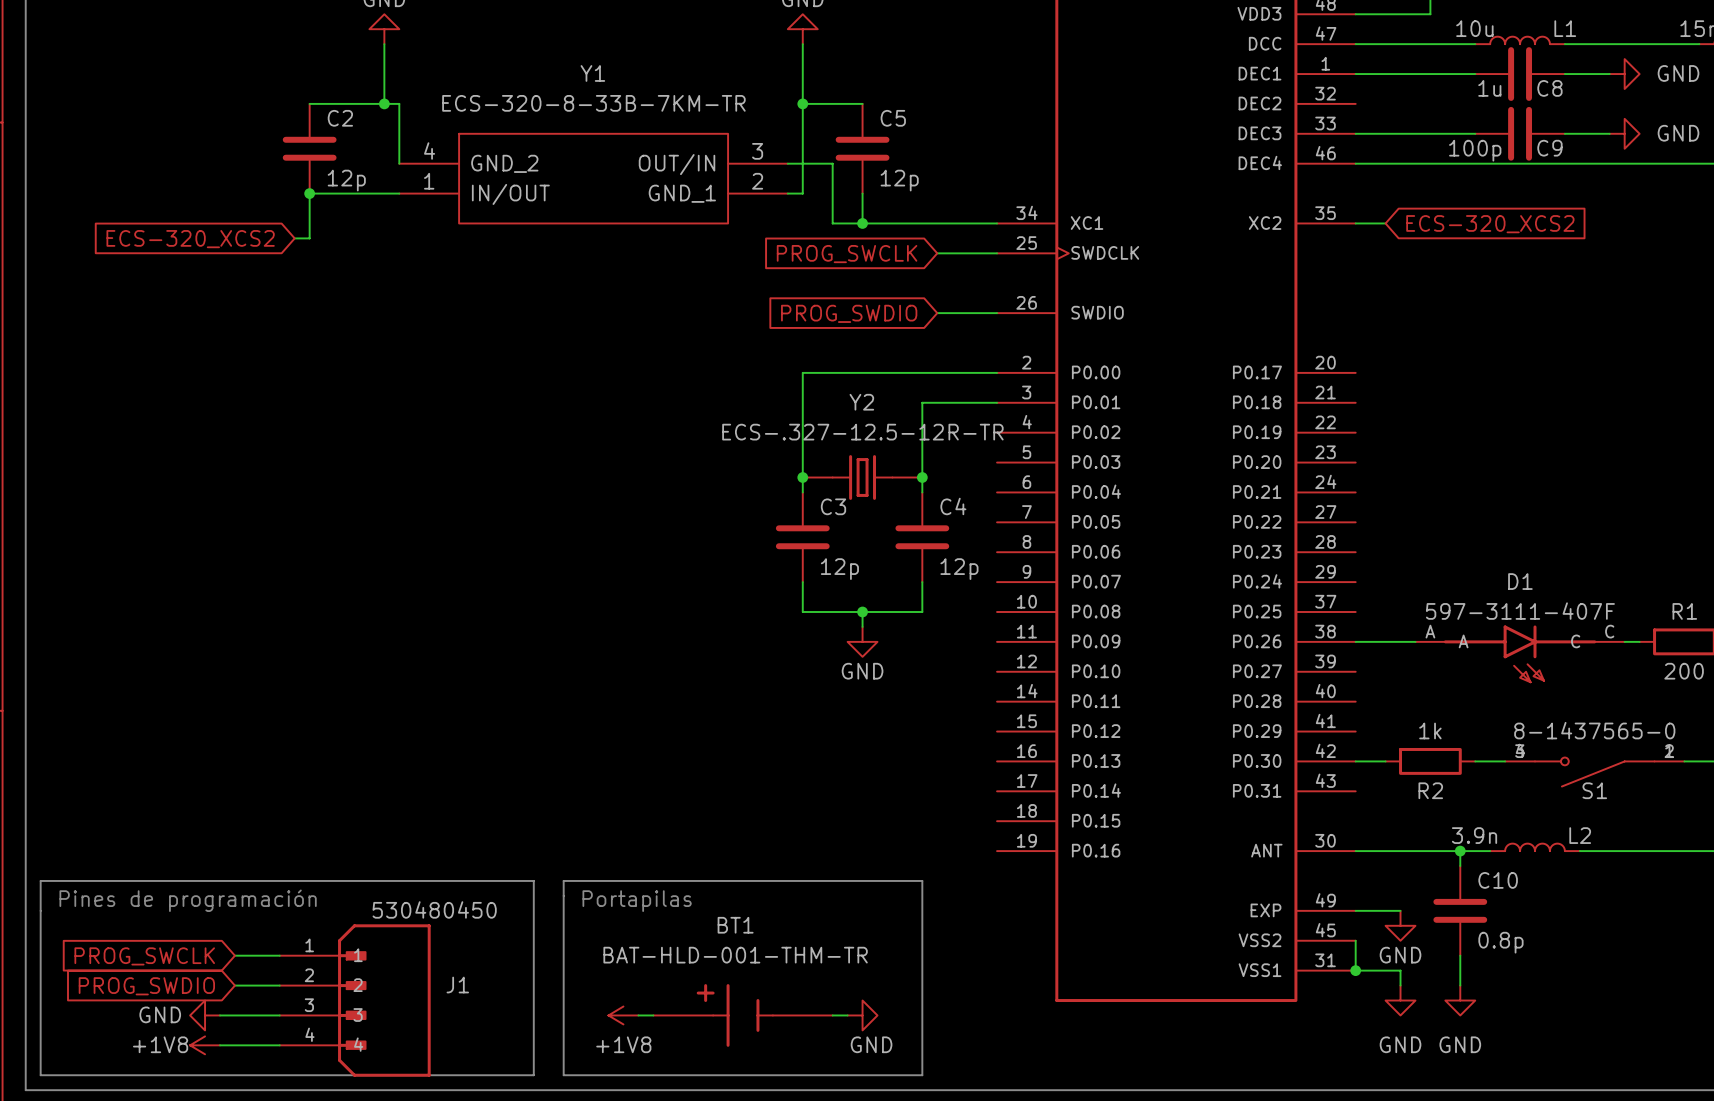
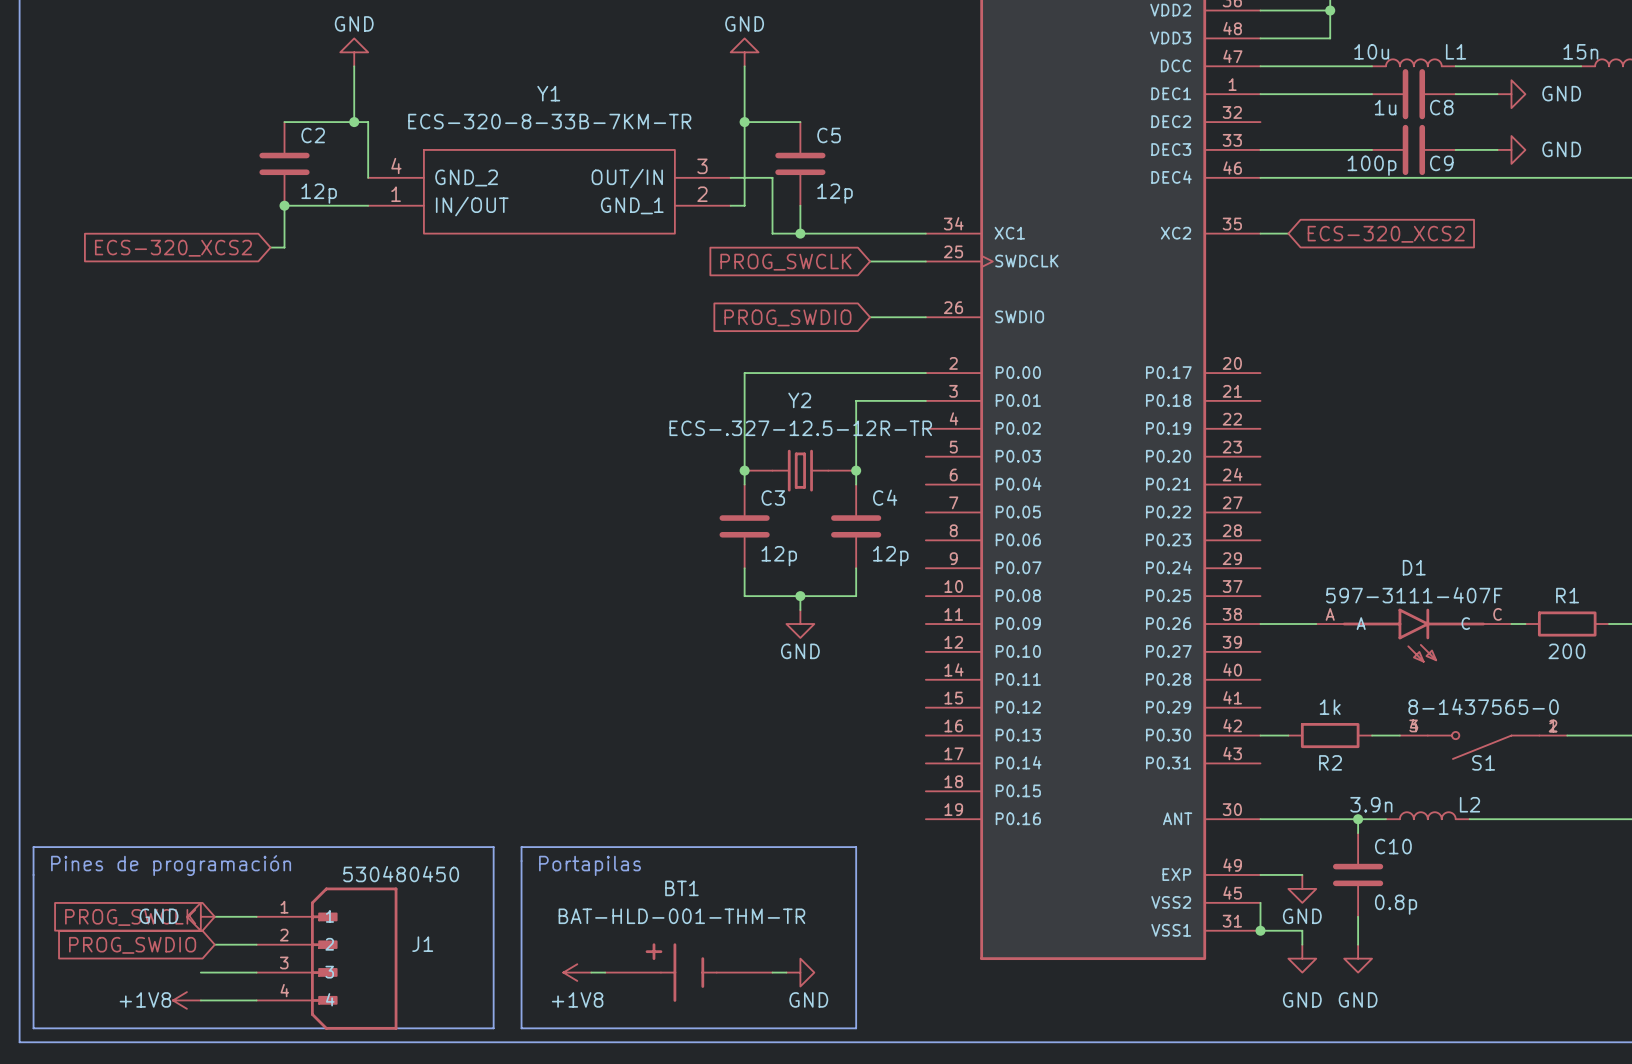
power symbol position: GND (205, 1015) -> GND (200, 916)

